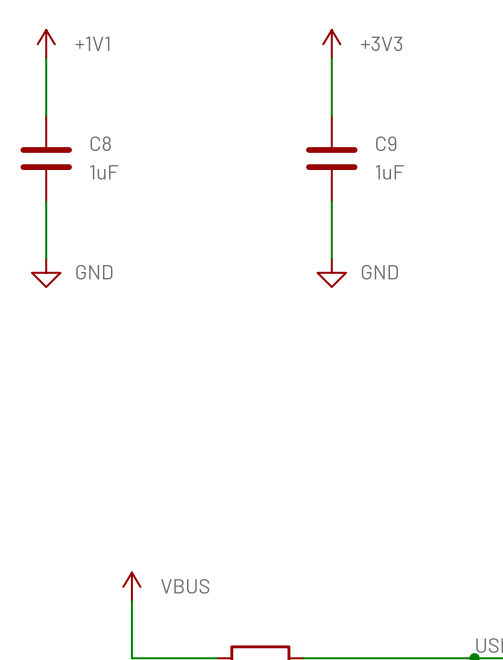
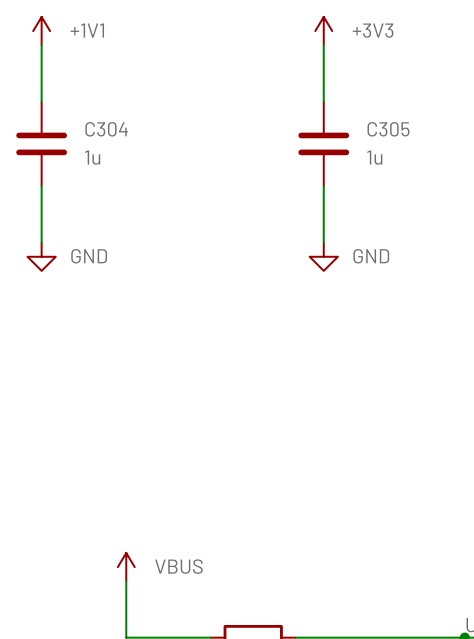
C8 name: C8 (100, 143) -> C304 (106, 129)
C9 name: C9 (386, 143) -> C305 (388, 129)
C8 value: 1uF (104, 172) -> 1u (92, 157)
C9 value: 1uF (389, 172) -> 1u (374, 157)

